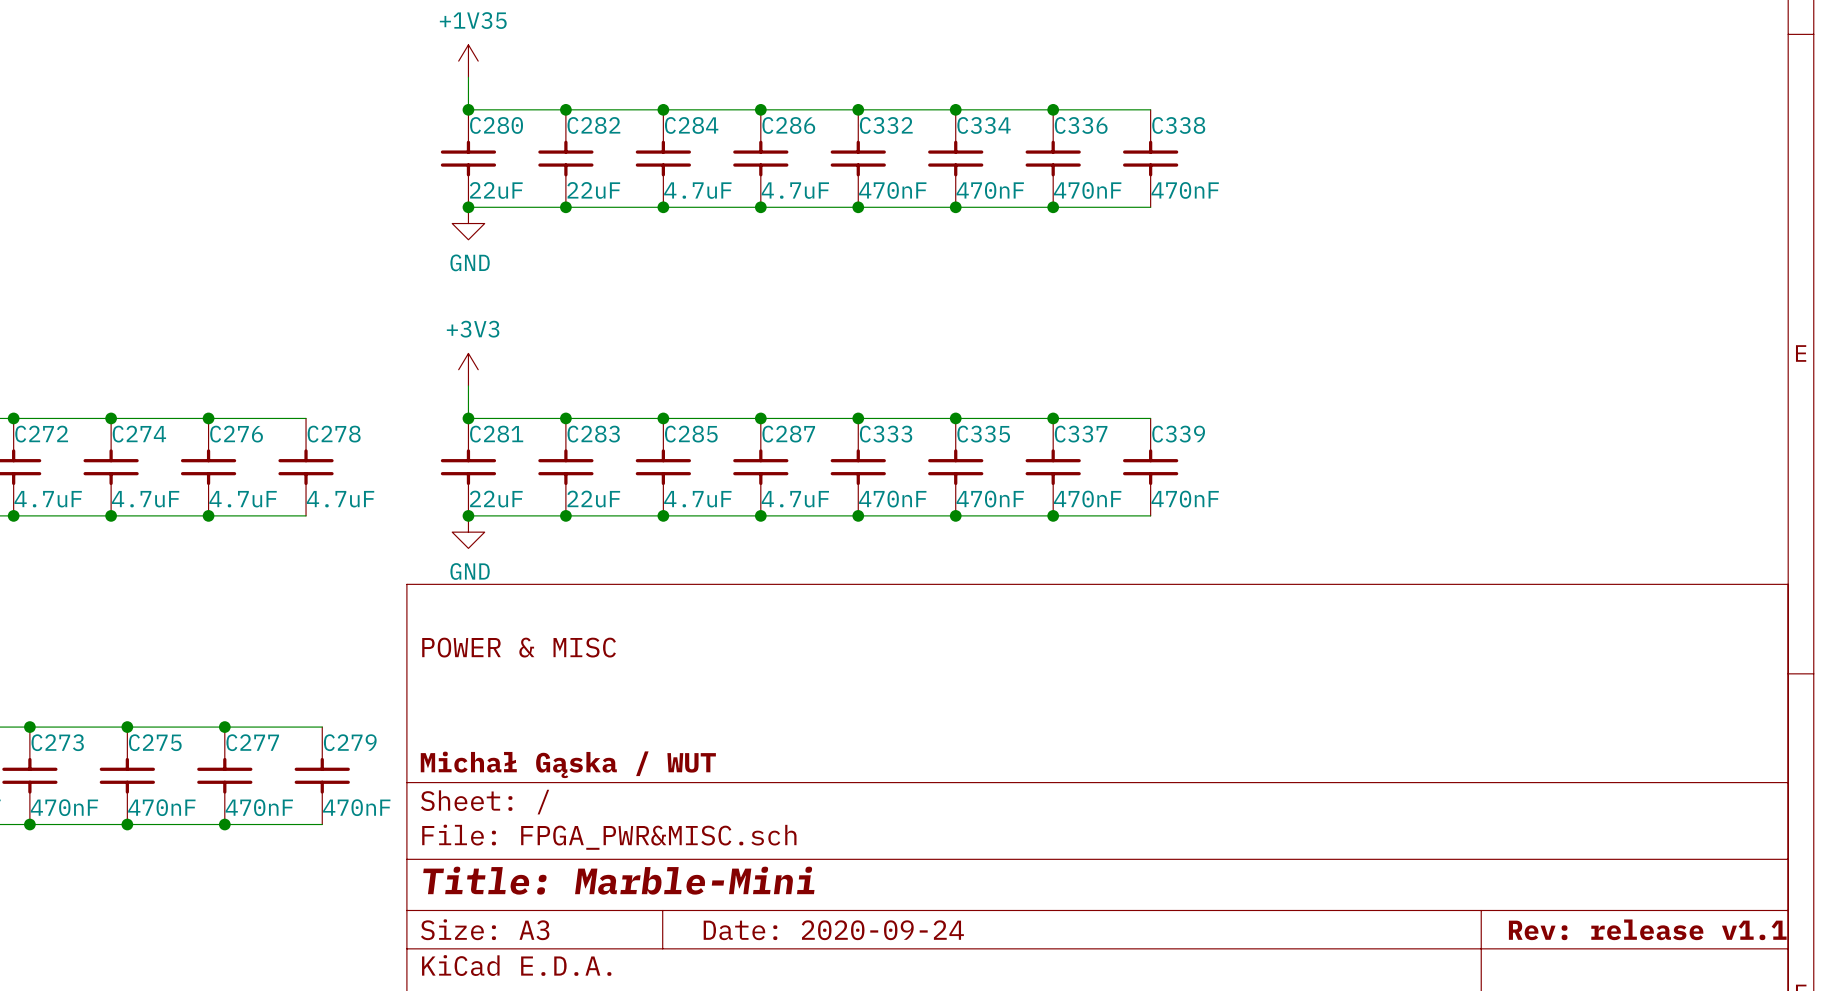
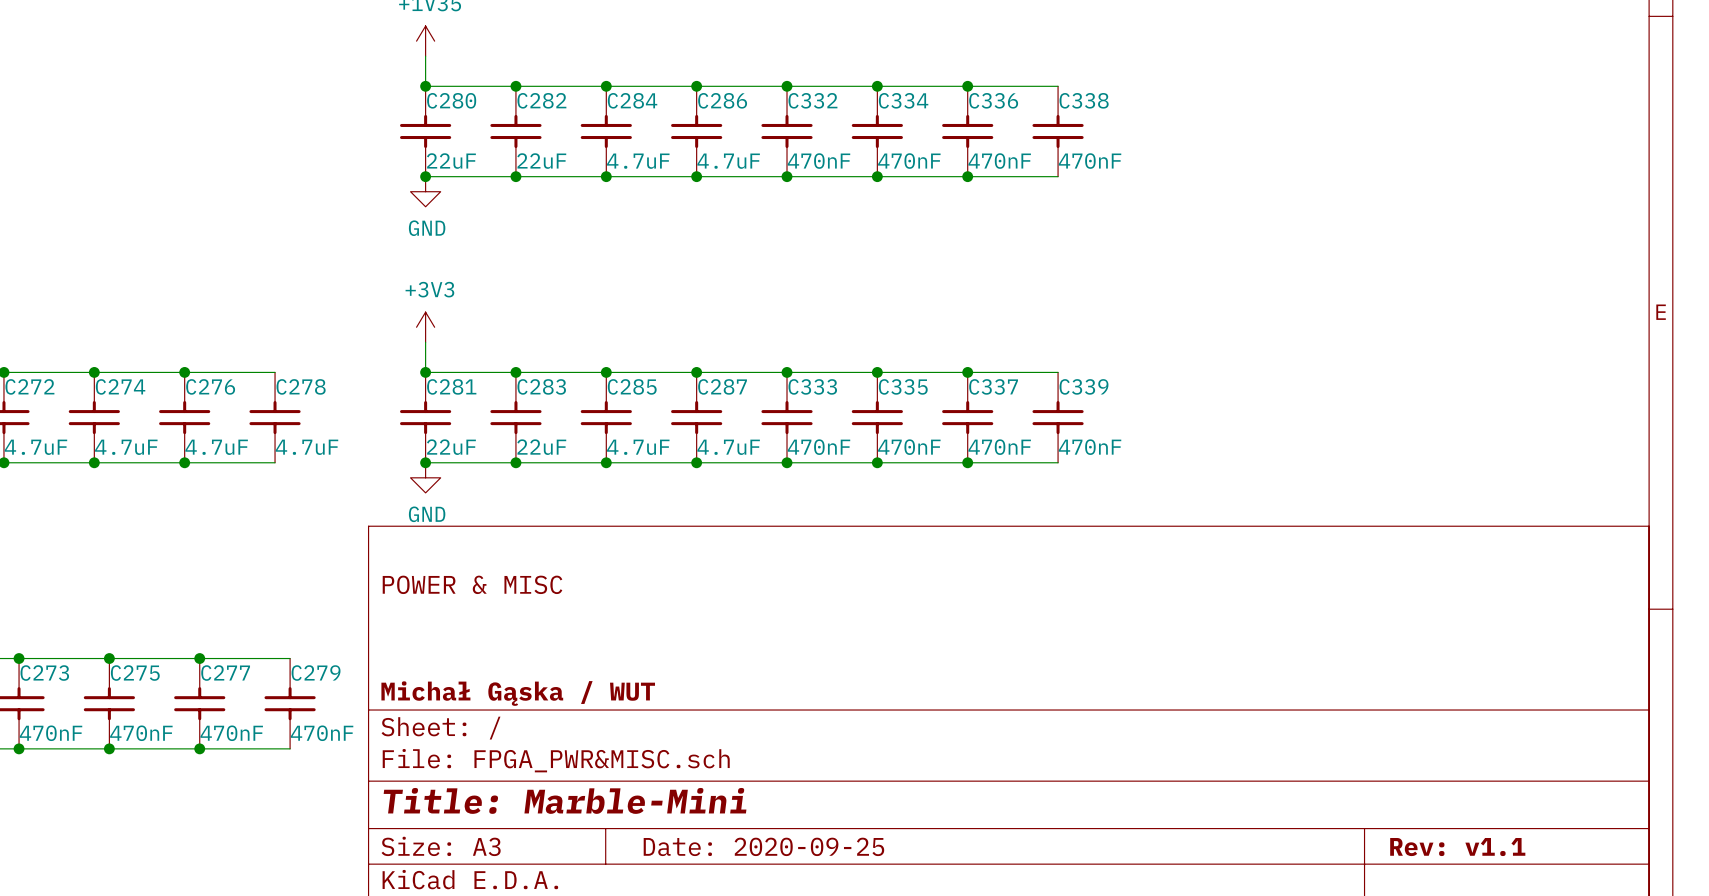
title block: Rev: release v1.1 (1647, 929) -> Rev: v1.1 (1457, 847)
title block: Date: 2020-09-24 (833, 930) -> Date: 2020-09-25 (763, 846)

